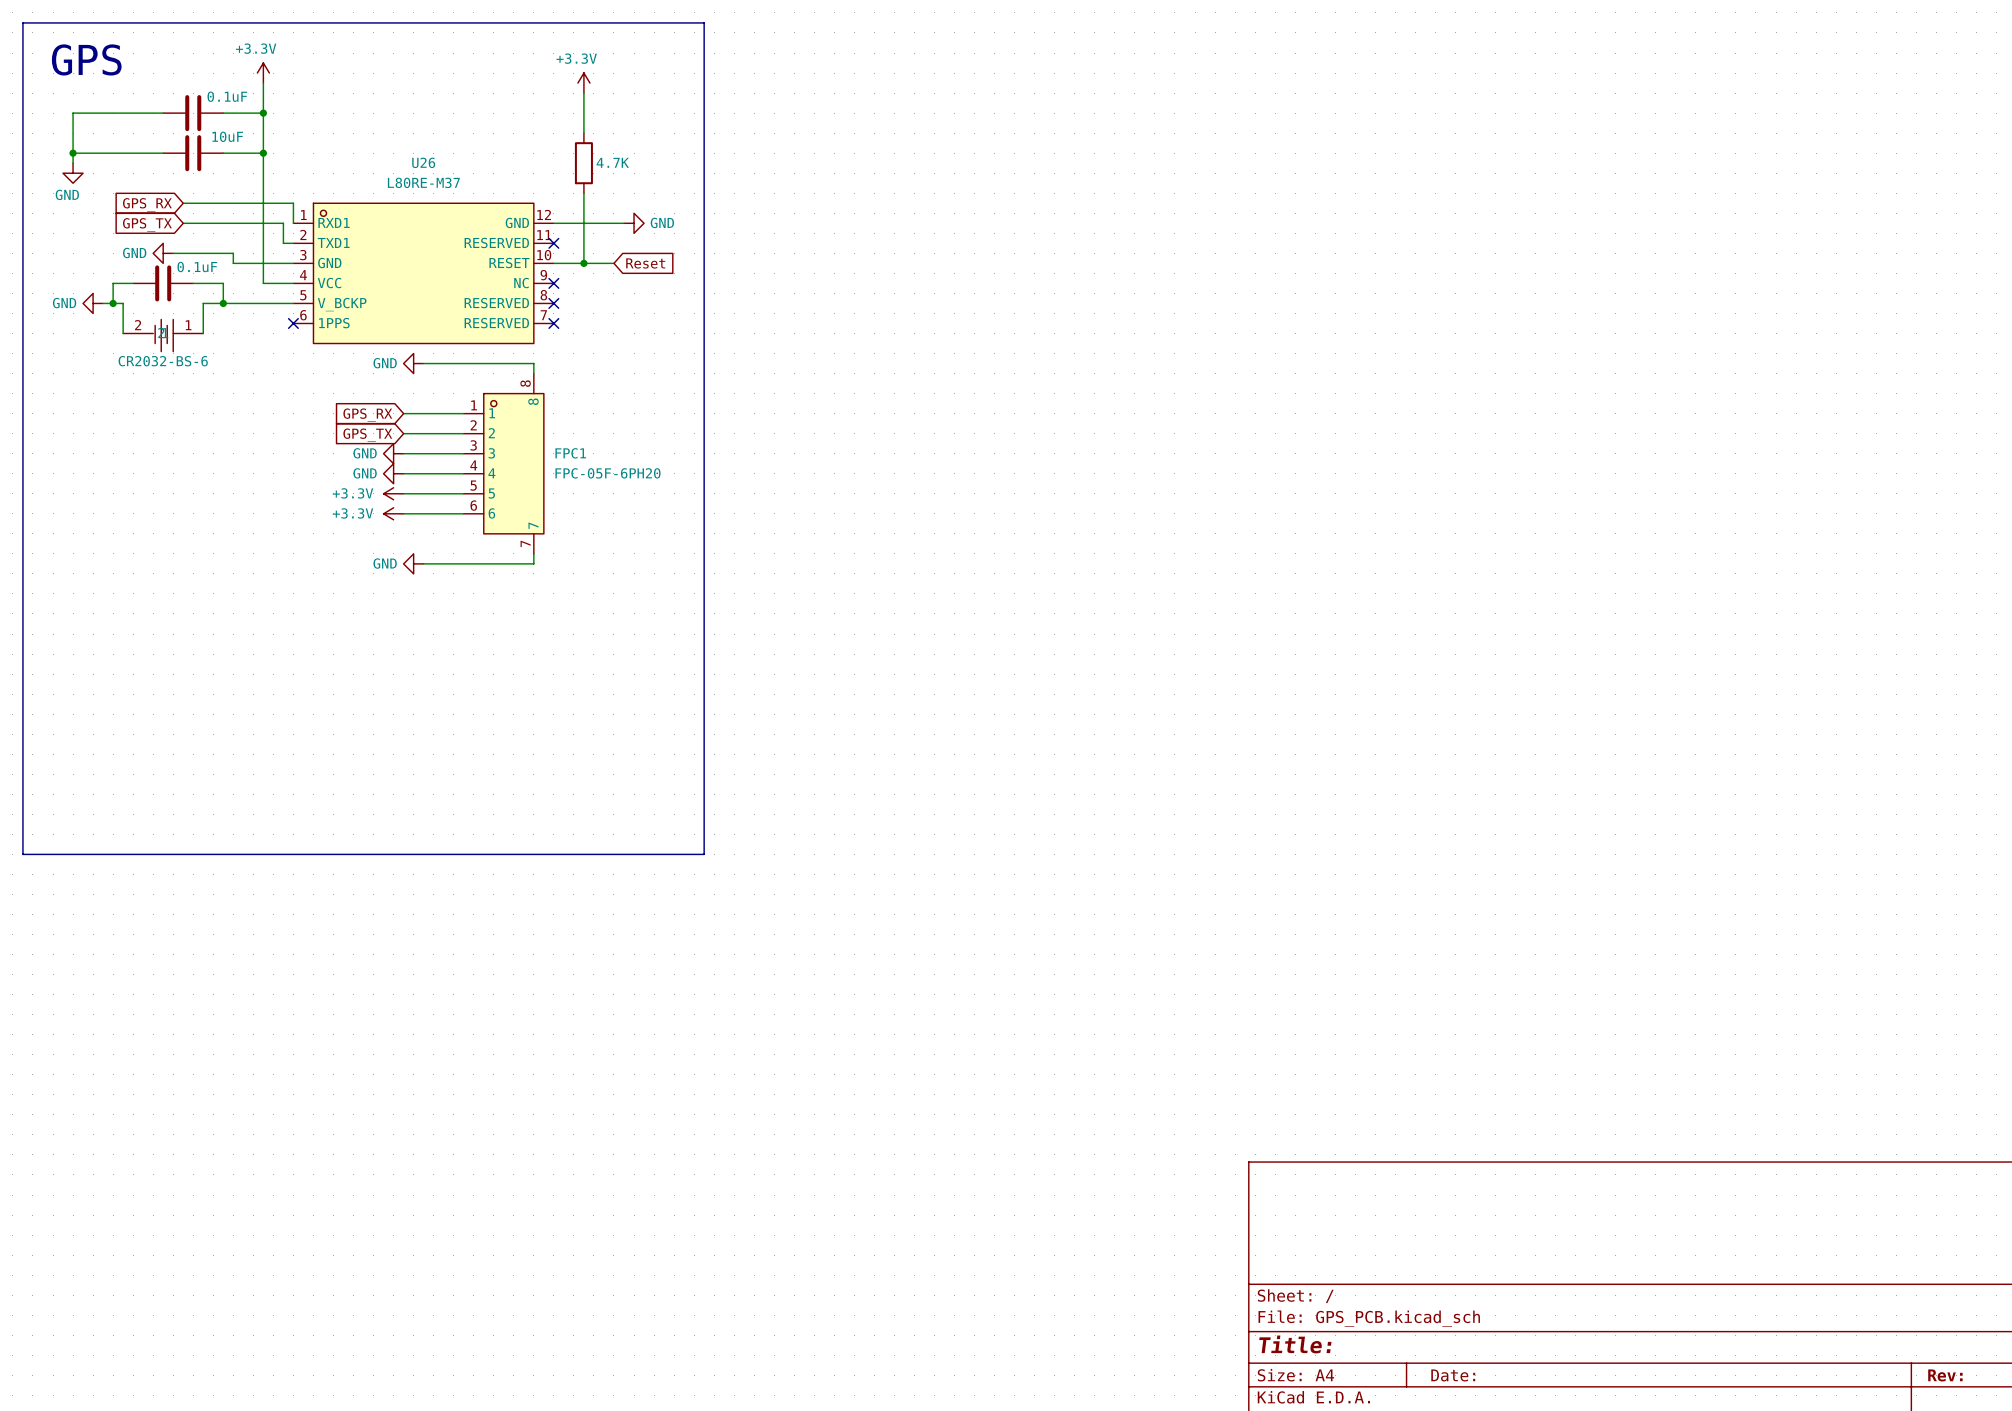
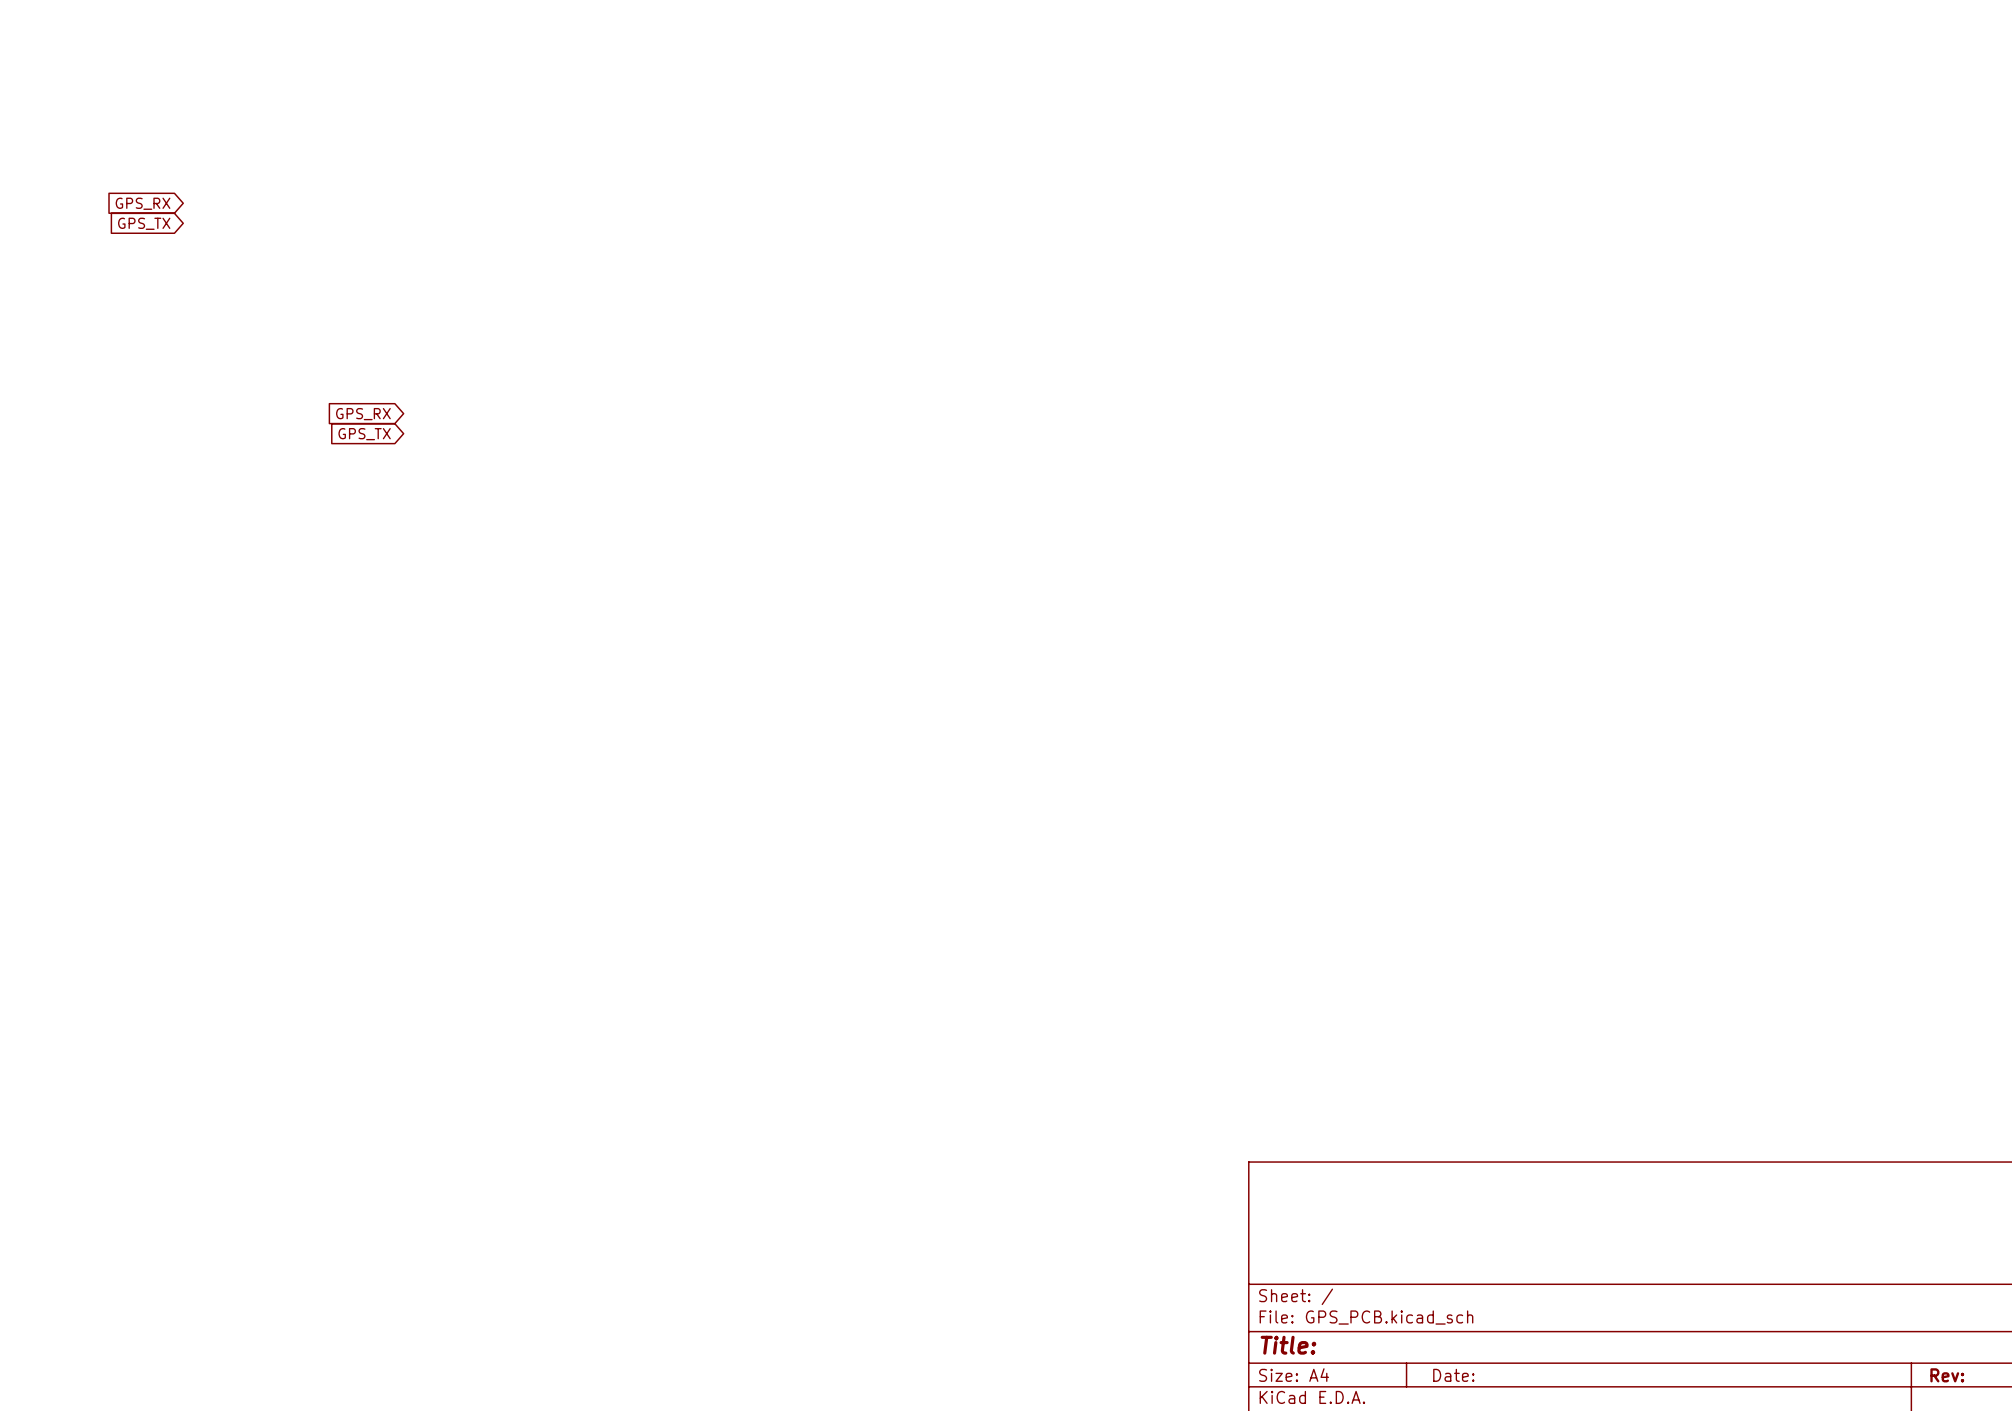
line: (22, 22) (704, 22) (704, 854) (22, 854) (22, 22) -> none
text: GPS (86, 59) -> none
power symbol: +3.3V (263, 73) -> none
wire: (263, 83) (263, 283) (293, 283) -> none
power symbol: +3.3V (583, 83) -> none
wire: (583, 93) (583, 133) -> none
wire: (163, 113) (73, 113) (73, 163) -> none
part: 0.1uF (193, 113) -> none
wire: (223, 113) (263, 113) -> none
junction: (263, 113) -> none
wire: (73, 153) (163, 153) -> none
junction: (73, 153) -> none
part: 10uF (193, 153) -> none
wire: (223, 153) (263, 153) -> none
junction: (263, 153) -> none
part: 4.7K (583, 163) -> none
power symbol: GND (73, 173) -> none
wire: (583, 193) (583, 263) -> none
wire: (183, 203) (293, 203) (293, 223) -> none
wire: (183, 223) (283, 223) (283, 243) (293, 243) -> none
wire: (553, 223) (624, 223) -> none
power symbol: GND (634, 223) -> none
no-connect mark: (553, 243) -> none
power symbol: GND (163, 253) -> none
wire: (173, 253) (233, 253) (233, 263) (293, 263) -> none
wire: (553, 263) (613, 263) -> none
junction: (583, 263) -> none
global label: Reset (645, 263) -> none
U26: L80RE-M37 (423, 273) -> none
wire: (133, 283) (113, 283) (113, 303) -> none
part: 0.1uF (163, 283) -> none
wire: (193, 283) (223, 283) (223, 303) -> none
no-connect mark: (553, 283) -> none
power symbol: GND (93, 303) -> none
wire: (103, 303) (123, 303) (123, 333) -> none
junction: (113, 303) -> none
junction: (223, 303) -> none
wire: (293, 303) (203, 303) (203, 333) -> none
no-connect mark: (553, 303) -> none
no-connect mark: (293, 323) -> none
no-connect mark: (553, 323) -> none
part: CR2032-BS-6 (163, 335) -> none
power symbol: GND (413, 363) -> none
wire: (423, 363) (533, 363) (533, 373) -> none
wire: (403, 413) (463, 413) -> none
wire: (403, 433) (463, 433) -> none
power symbol: GND (393, 453) -> none
wire: (403, 453) (463, 453) -> none
FPC1: FPC-05F-6PH20 (503, 463) -> none
power symbol: GND (393, 473) -> none
wire: (403, 473) (463, 473) -> none
power symbol: +3.3V (393, 493) -> none
wire: (403, 493) (463, 493) -> none
power symbol: +3.3V (393, 513) -> none
wire: (403, 513) (463, 513) -> none
wire: (533, 553) (533, 563) (423, 563) -> none
power symbol: GND (413, 563) -> none

